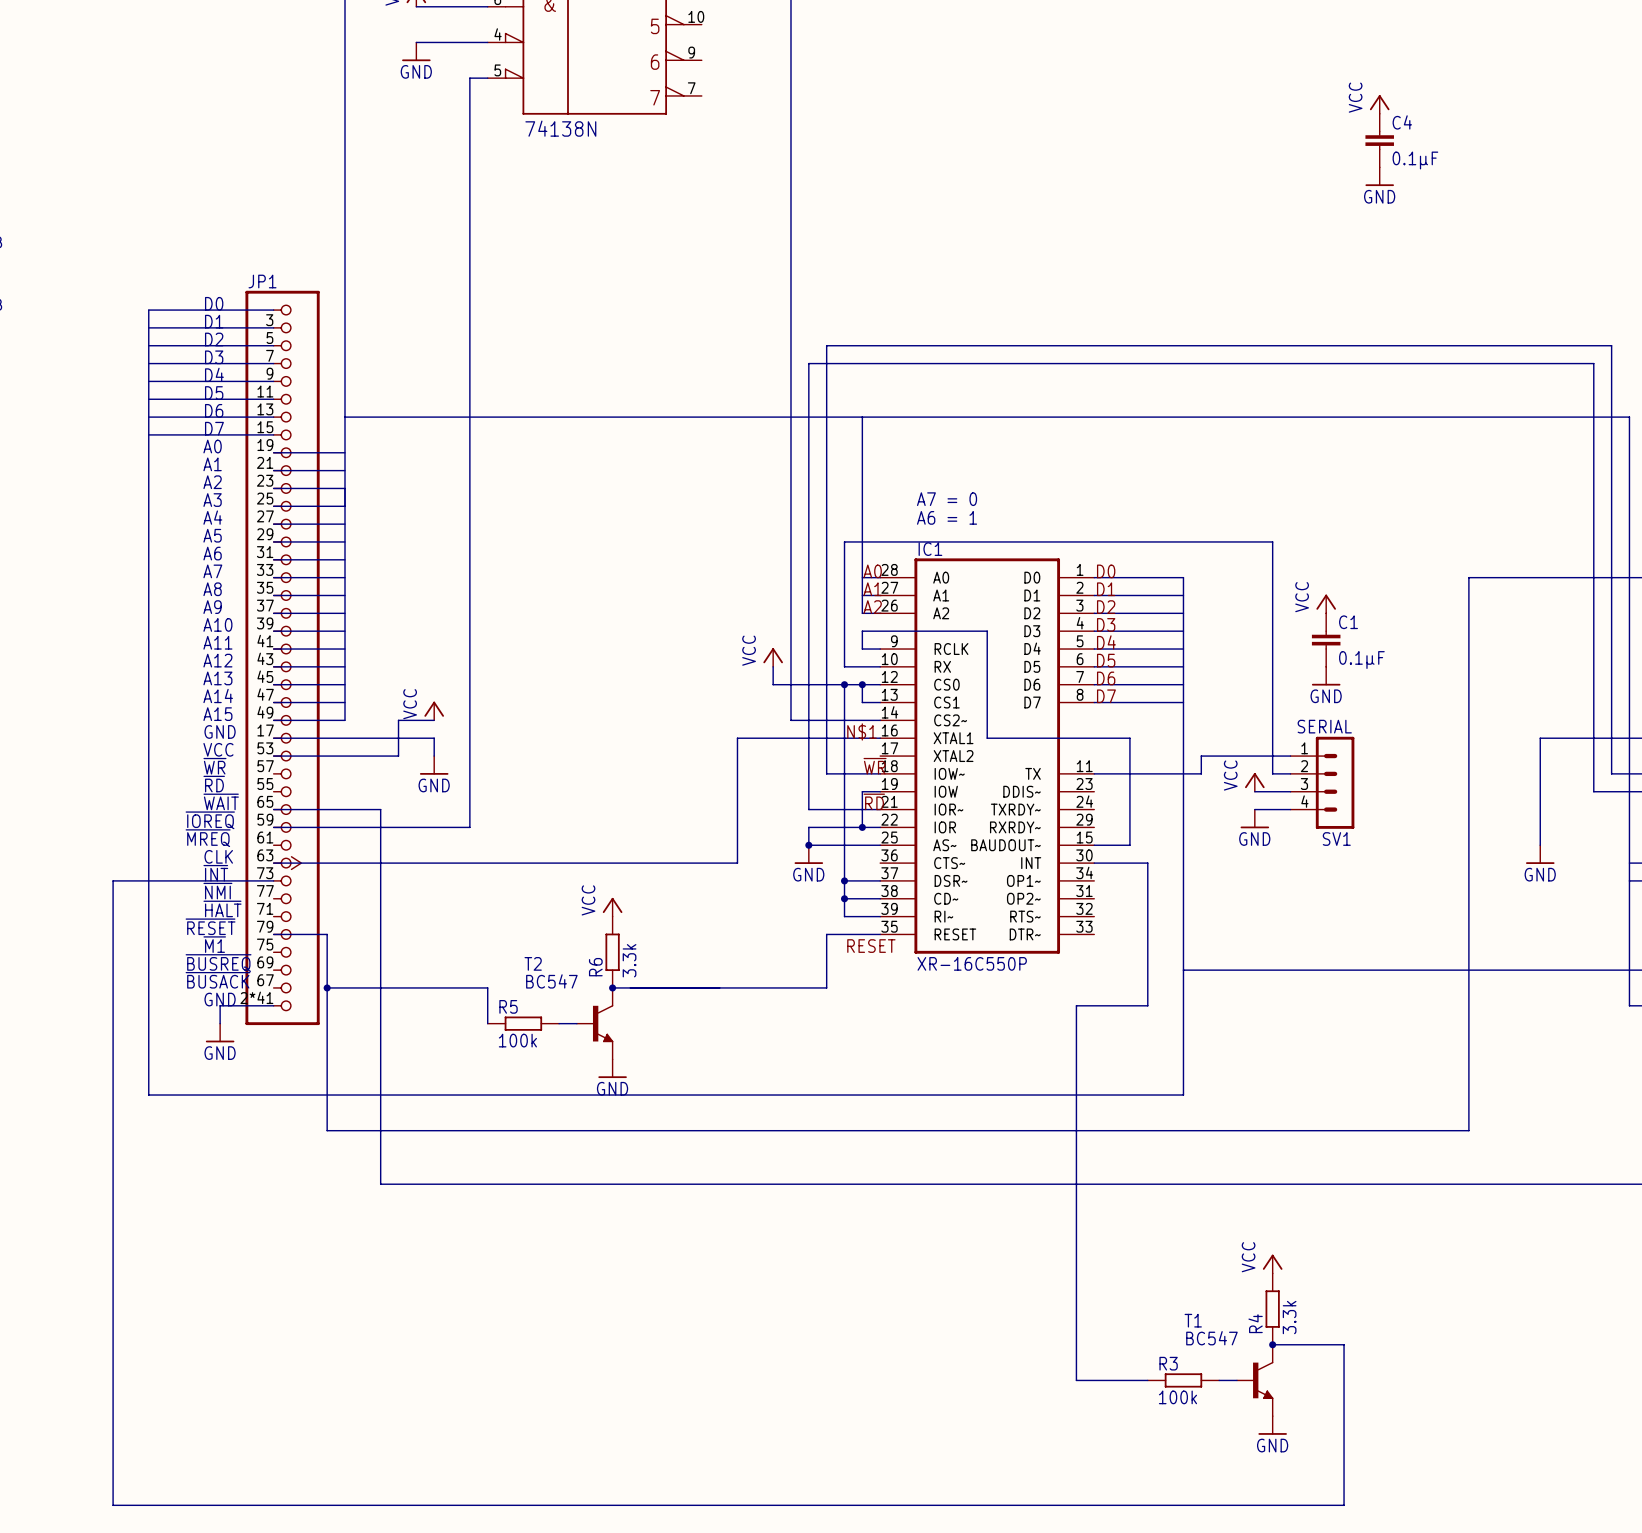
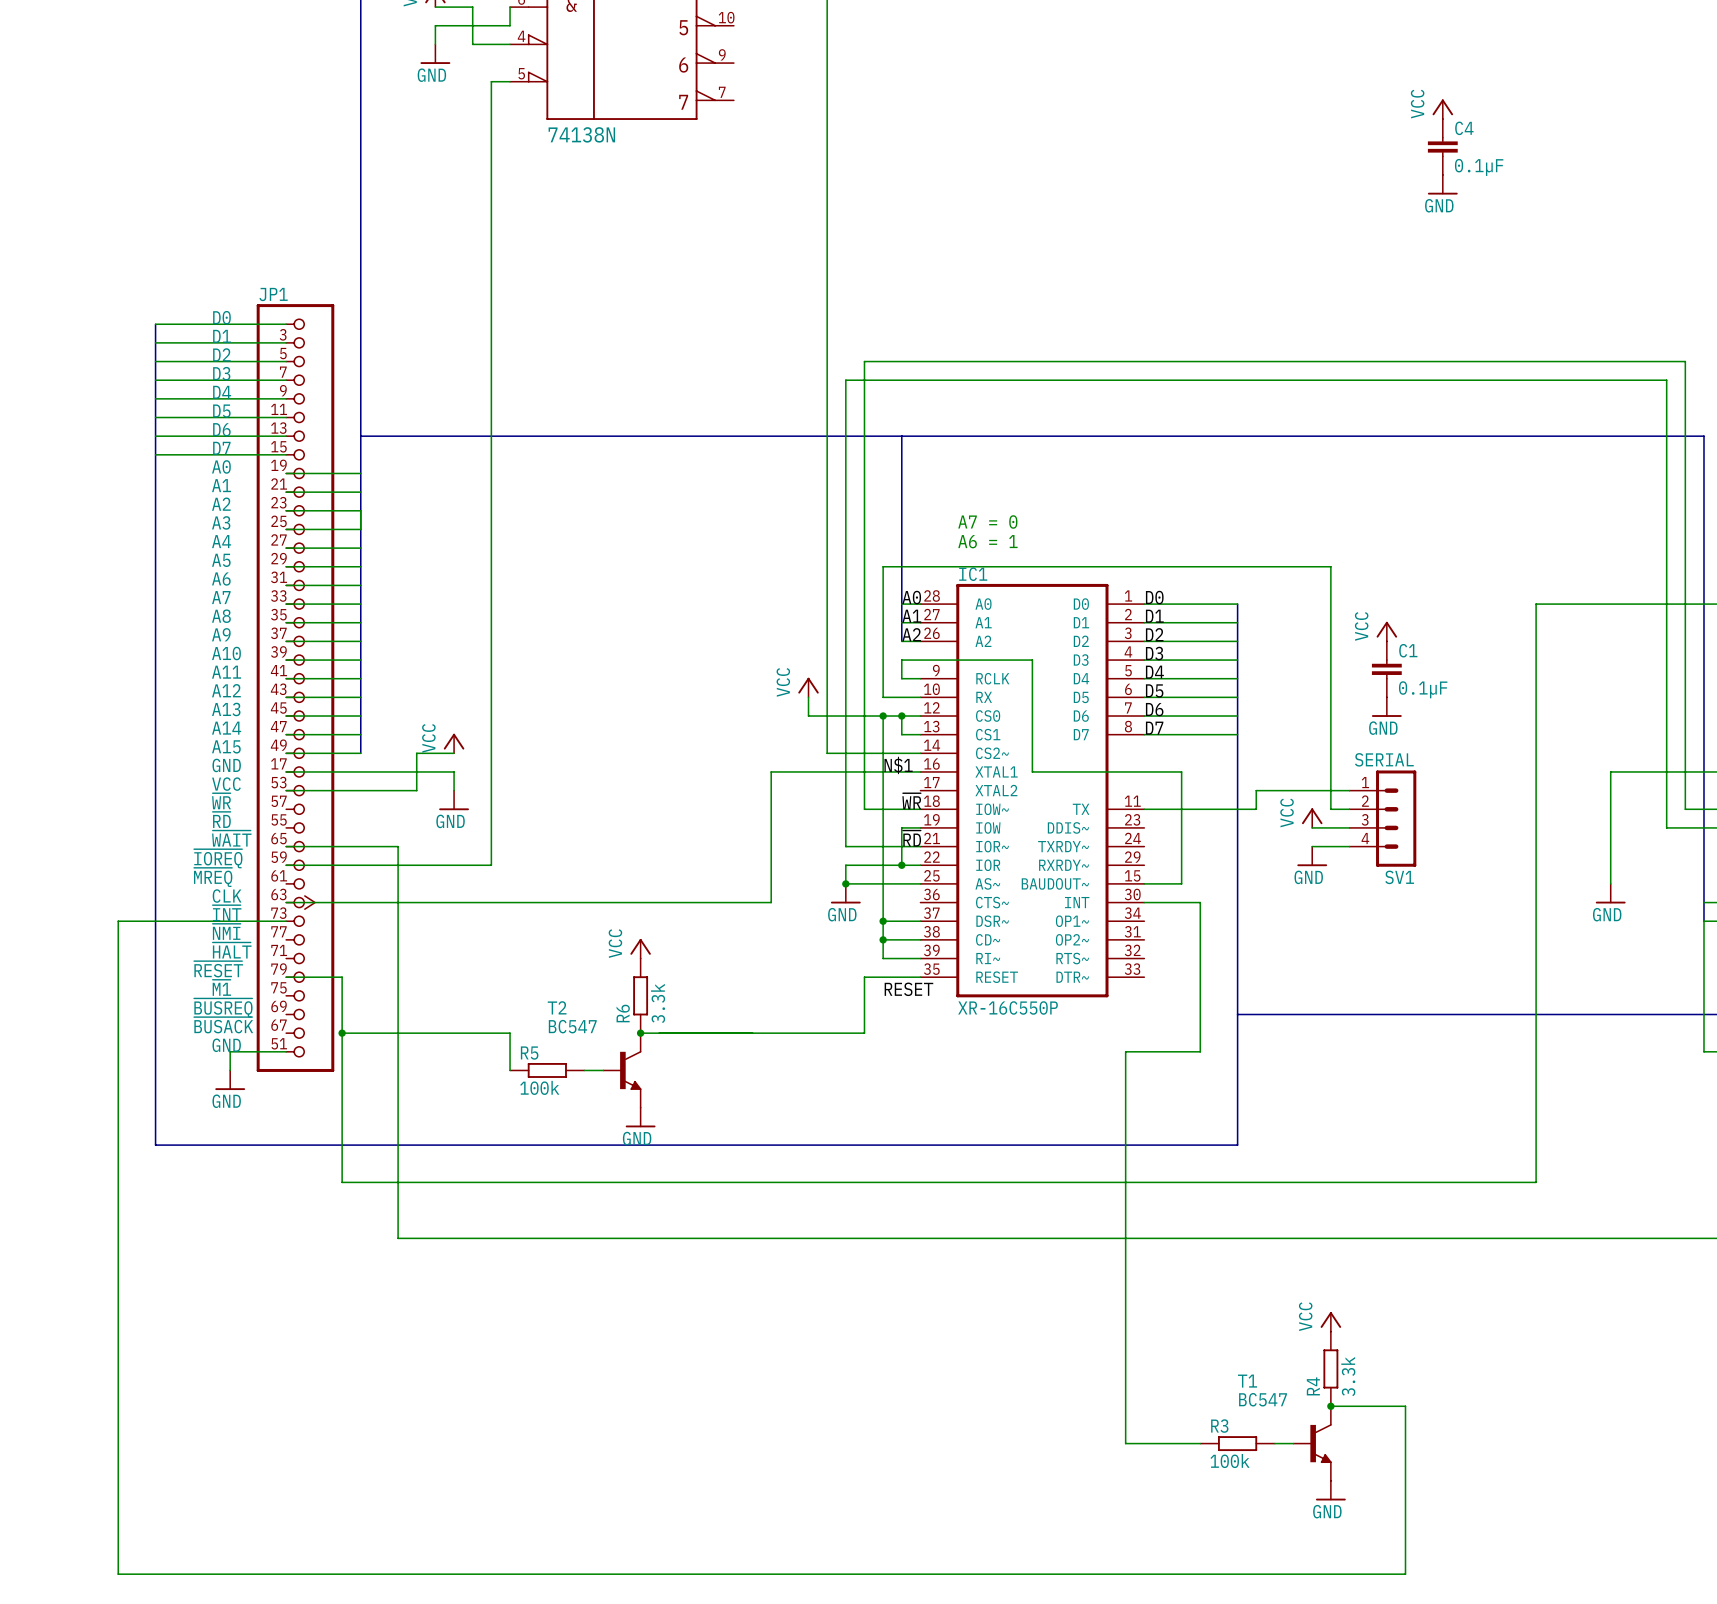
wire: (452, 6) (487, 6) -> (472, 7) (472, 44)
wire: (416, 42) (452, 42) -> (435, 44) (435, 25) (510, 25) (510, 7)
JP1 pin number: 2*41 (256, 997) -> 51 (279, 1043)

